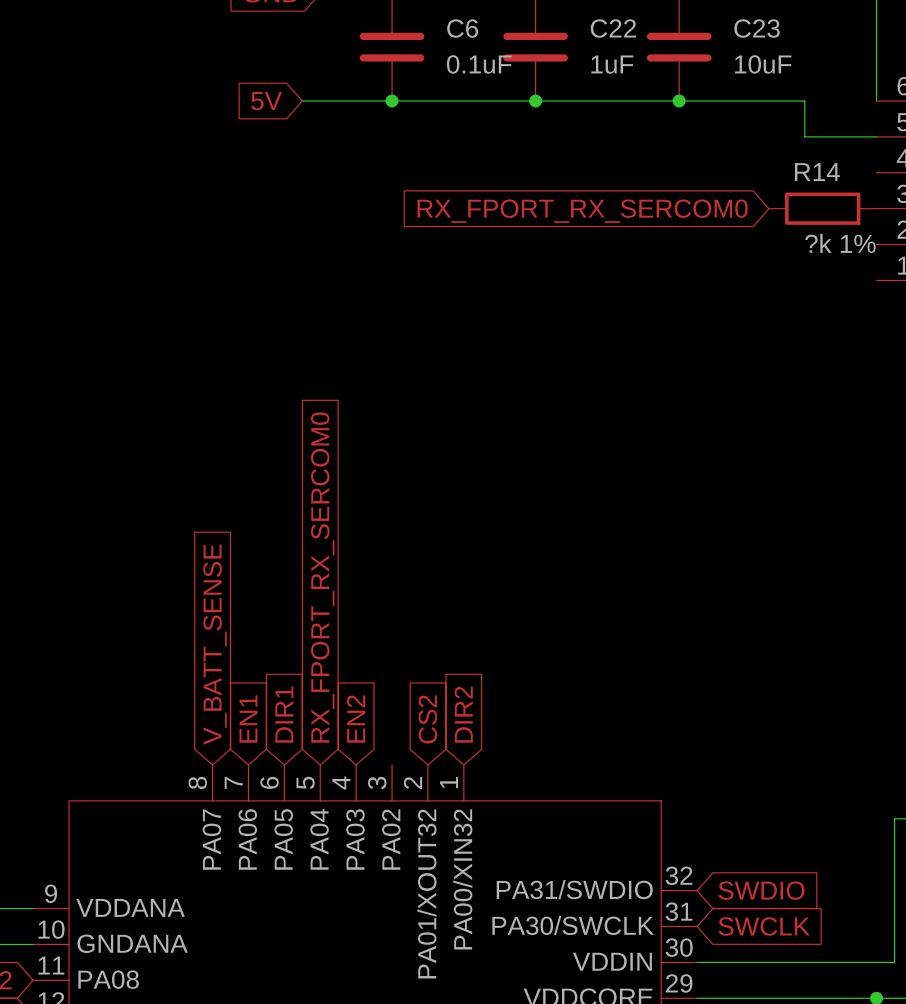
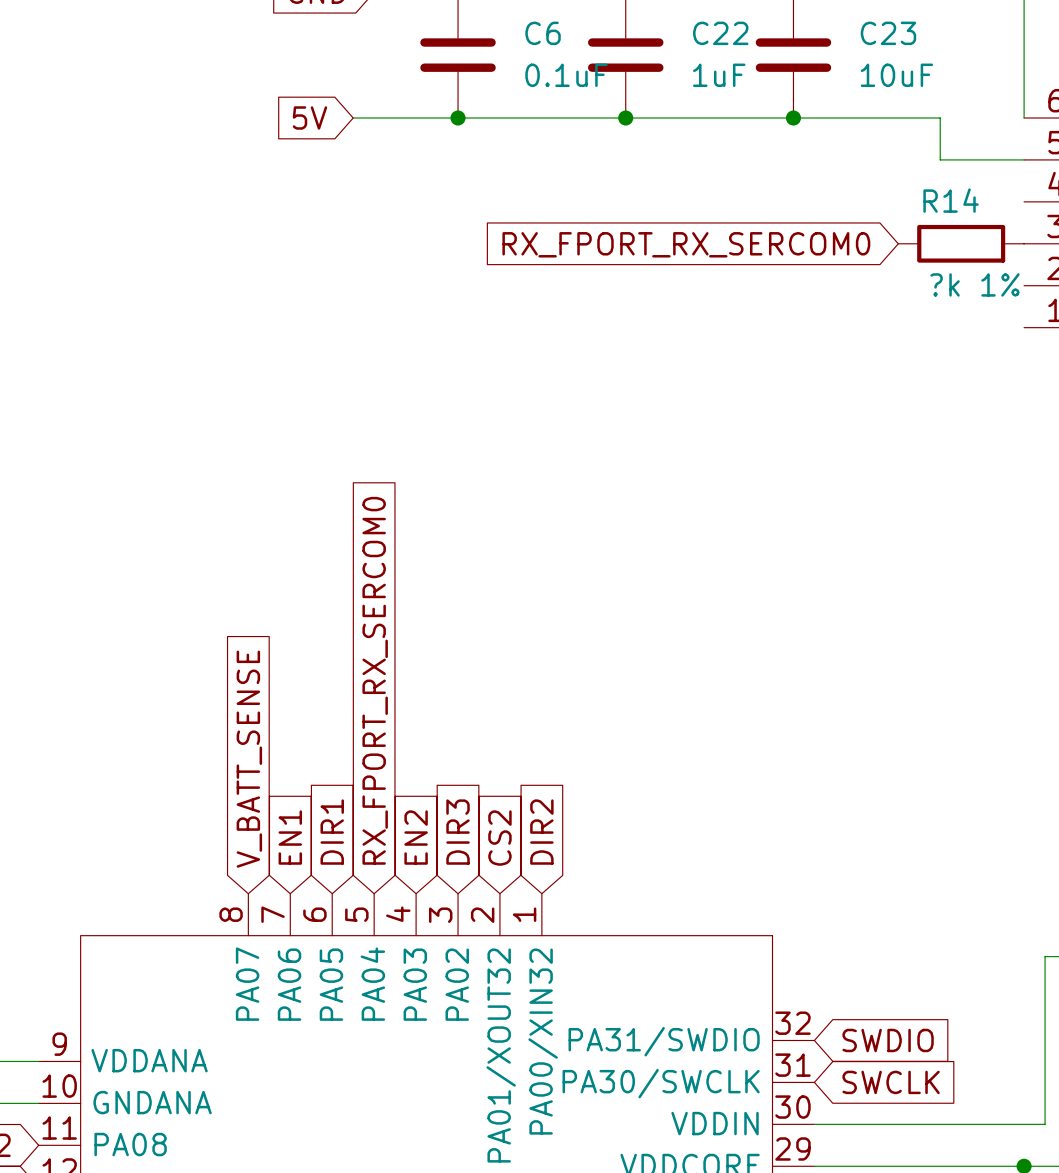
global label: none -> DIR3 (458, 832)

